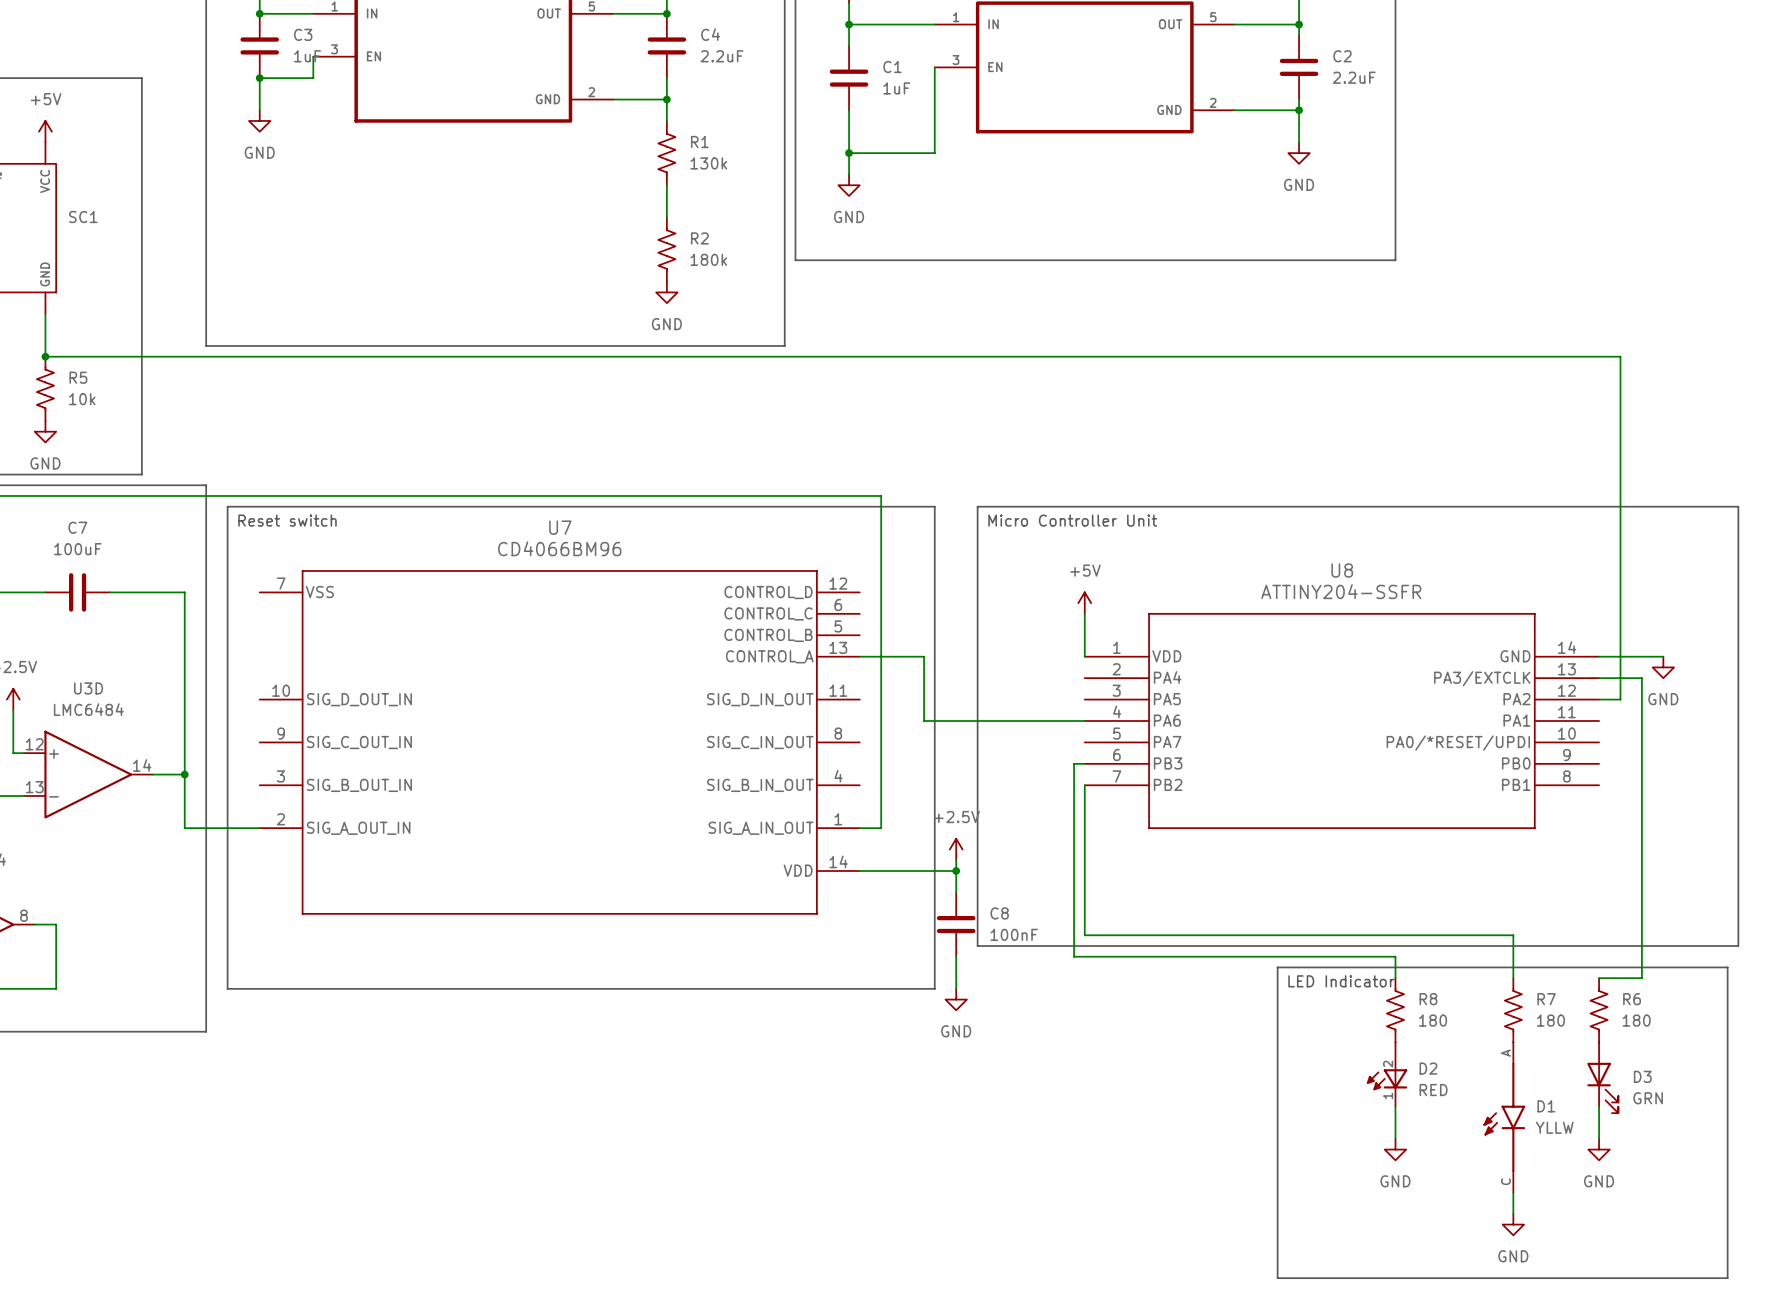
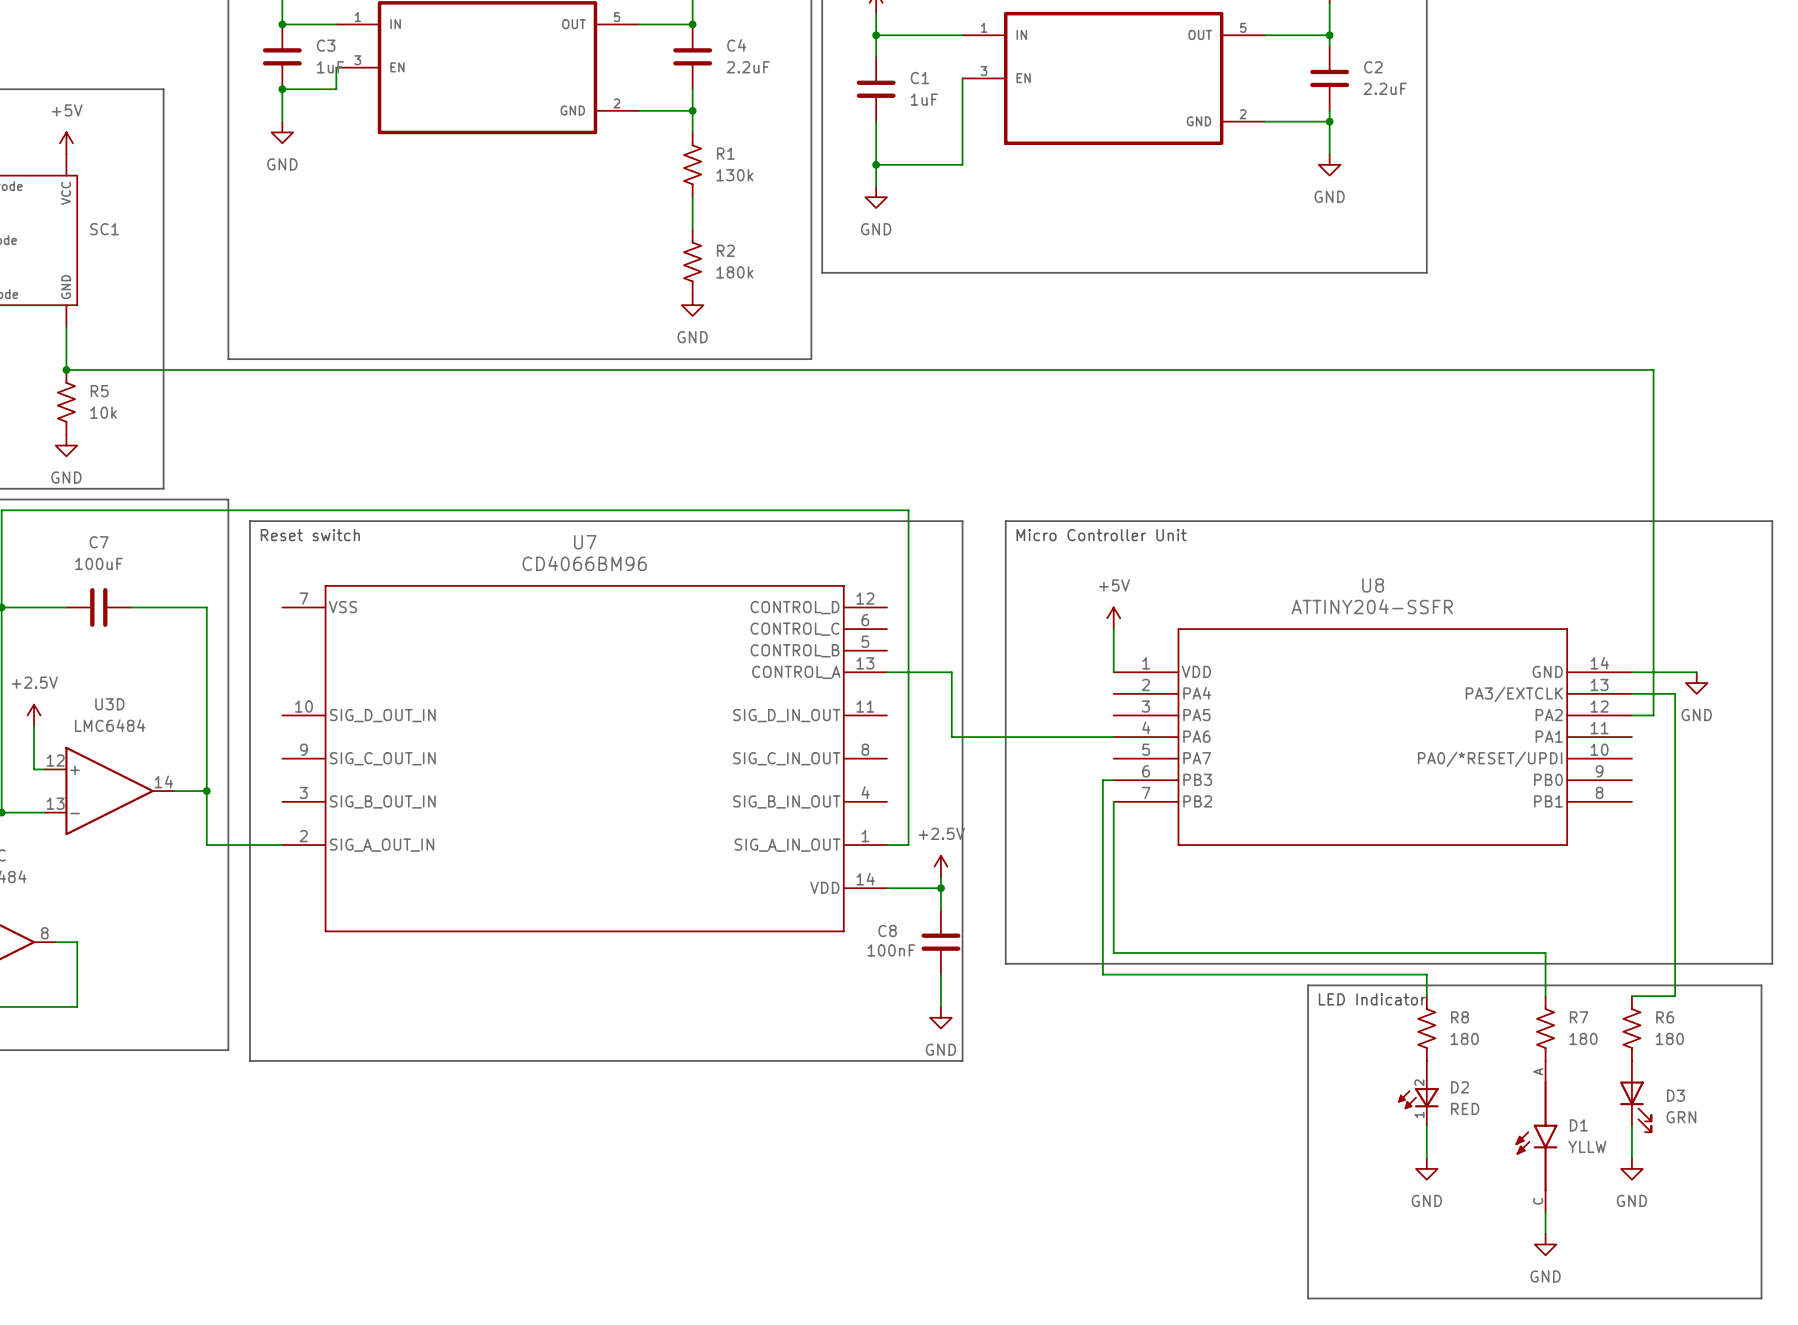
power symbol position: +2.5V (956, 849) -> +2.5V (940, 866)
wire: (956, 860) (956, 892) -> (940, 877) (940, 909)
wire: (913, 870) (956, 870) -> none
junction position: (956, 870) -> (940, 888)
C8 name position: C8 (999, 913) -> C8 (887, 930)
C8 position: (956, 924) -> (940, 942)
C8 value position: 100nF (1014, 934) -> 100nF (891, 950)
wire: (956, 956) (956, 988) -> (940, 974) (940, 1006)
line: (227, 988) (934, 988) -> (249, 1006) (249, 1060) (962, 1060) (962, 1006)
power symbol position: GND (956, 999) -> GND (940, 1017)

